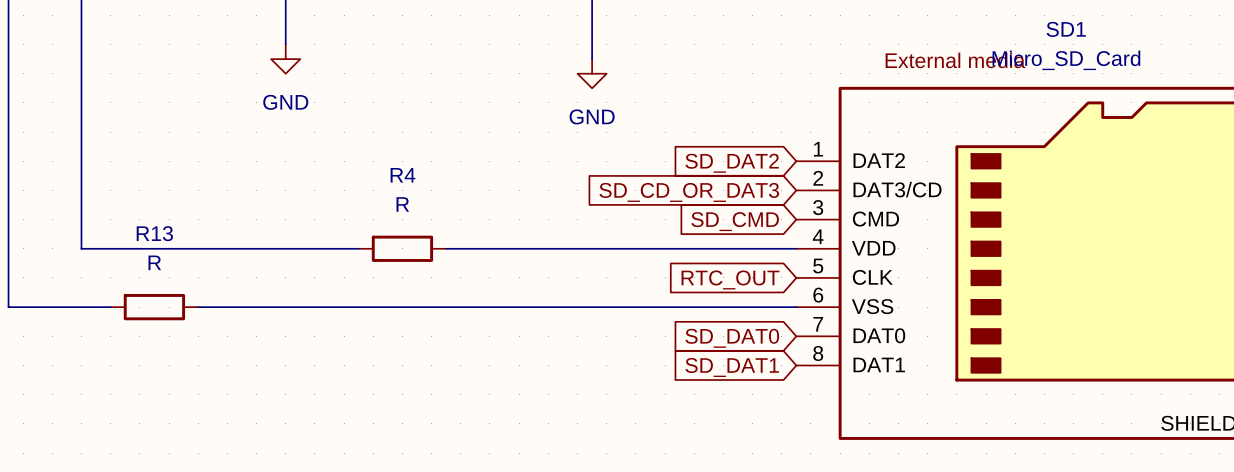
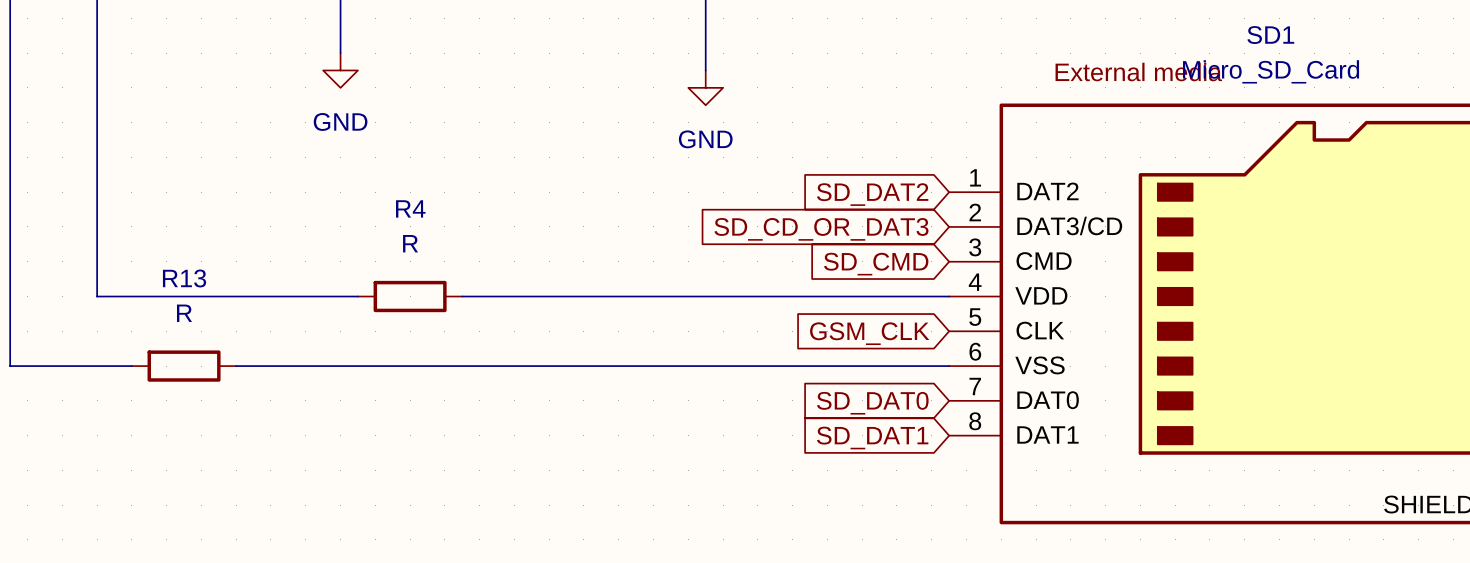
wire: (300, 248) (358, 248) -> (462, 296) (531, 296)
R4 position: (402, 248) -> (410, 296)
global label: RTC_OUT (730, 279) -> GSM_CLK (869, 333)

